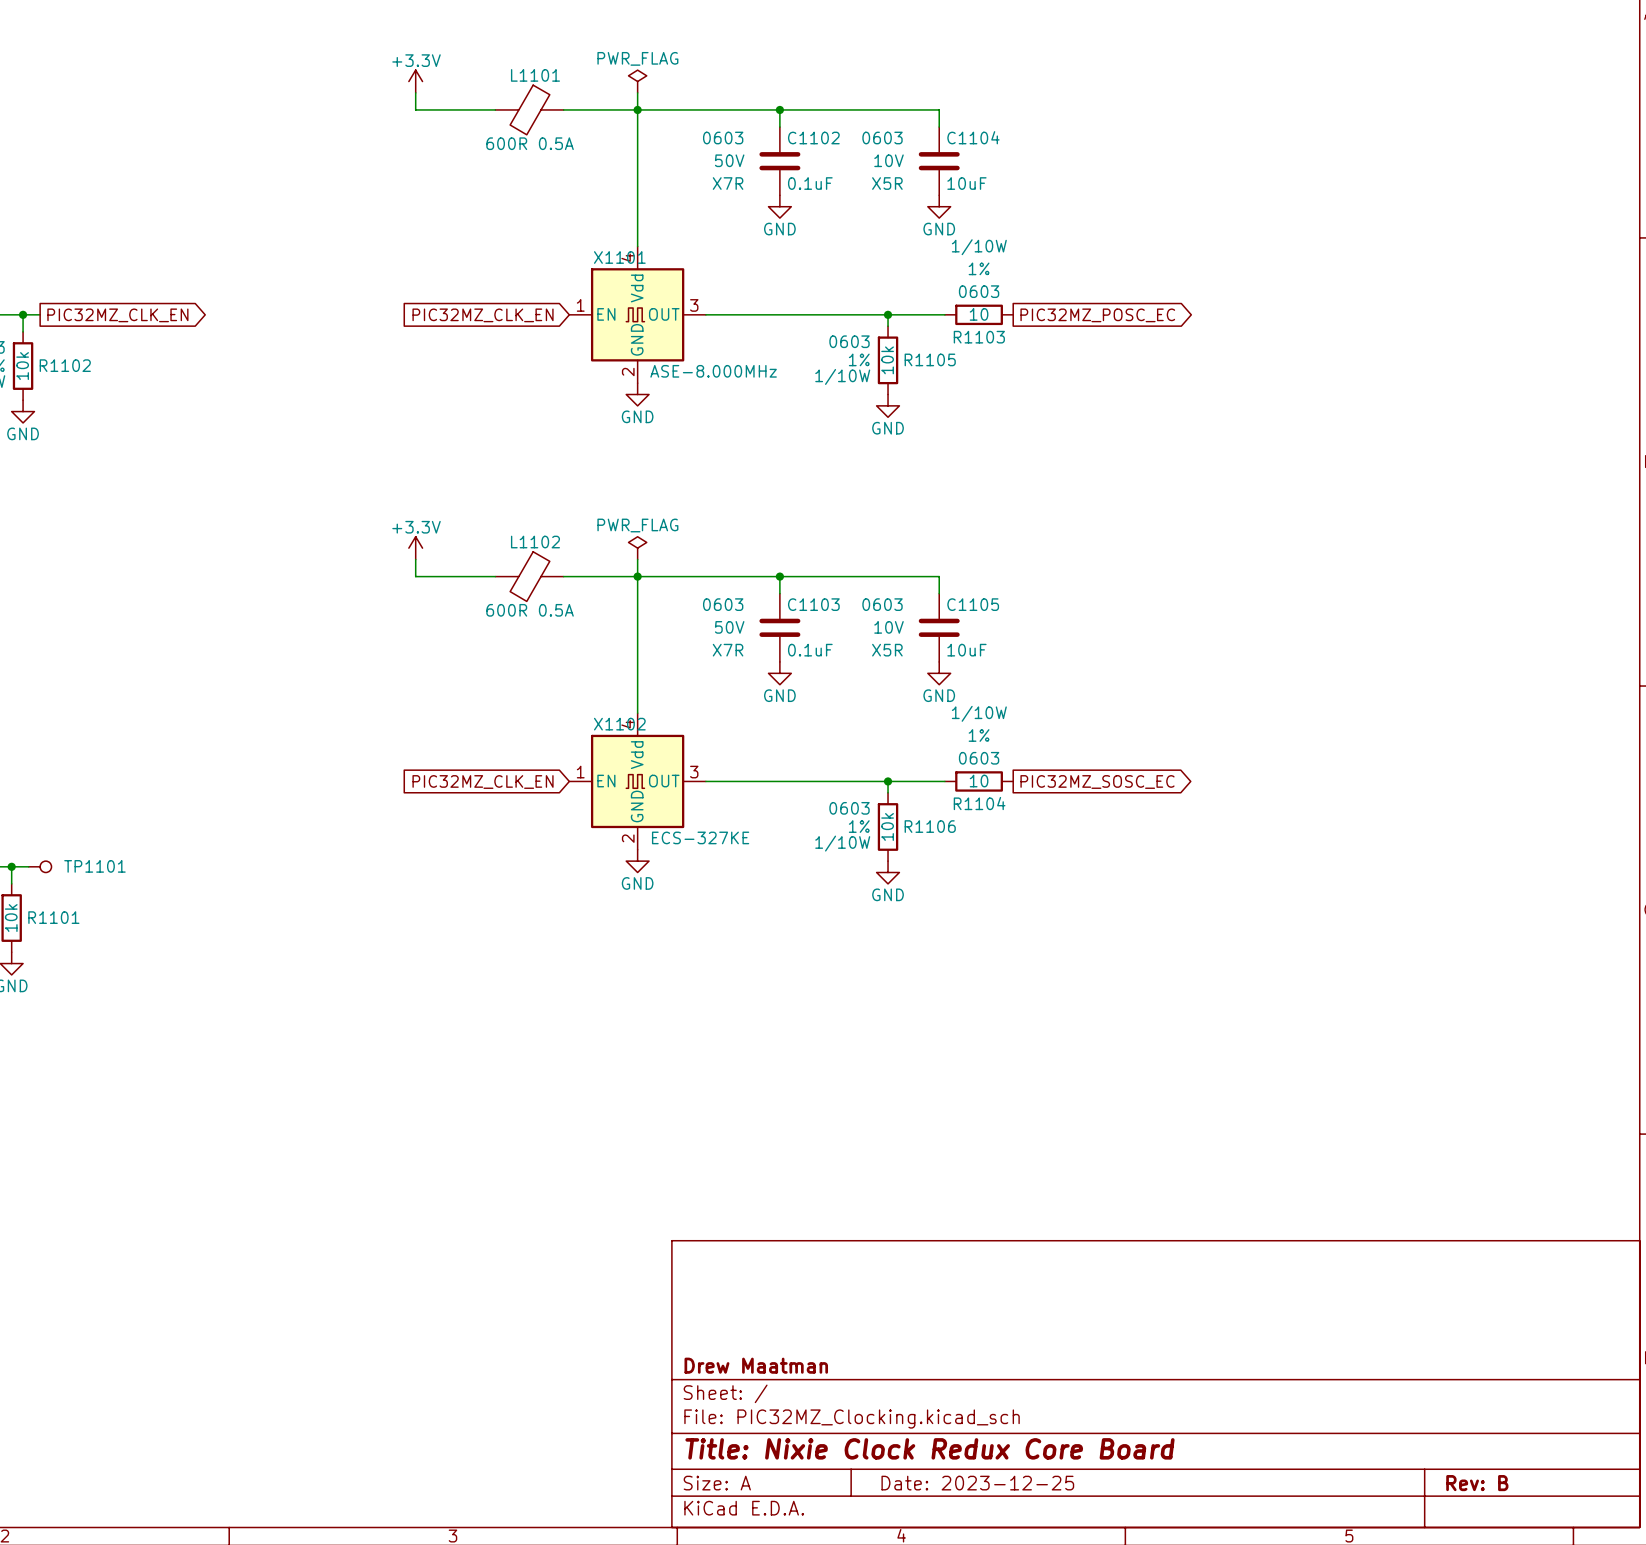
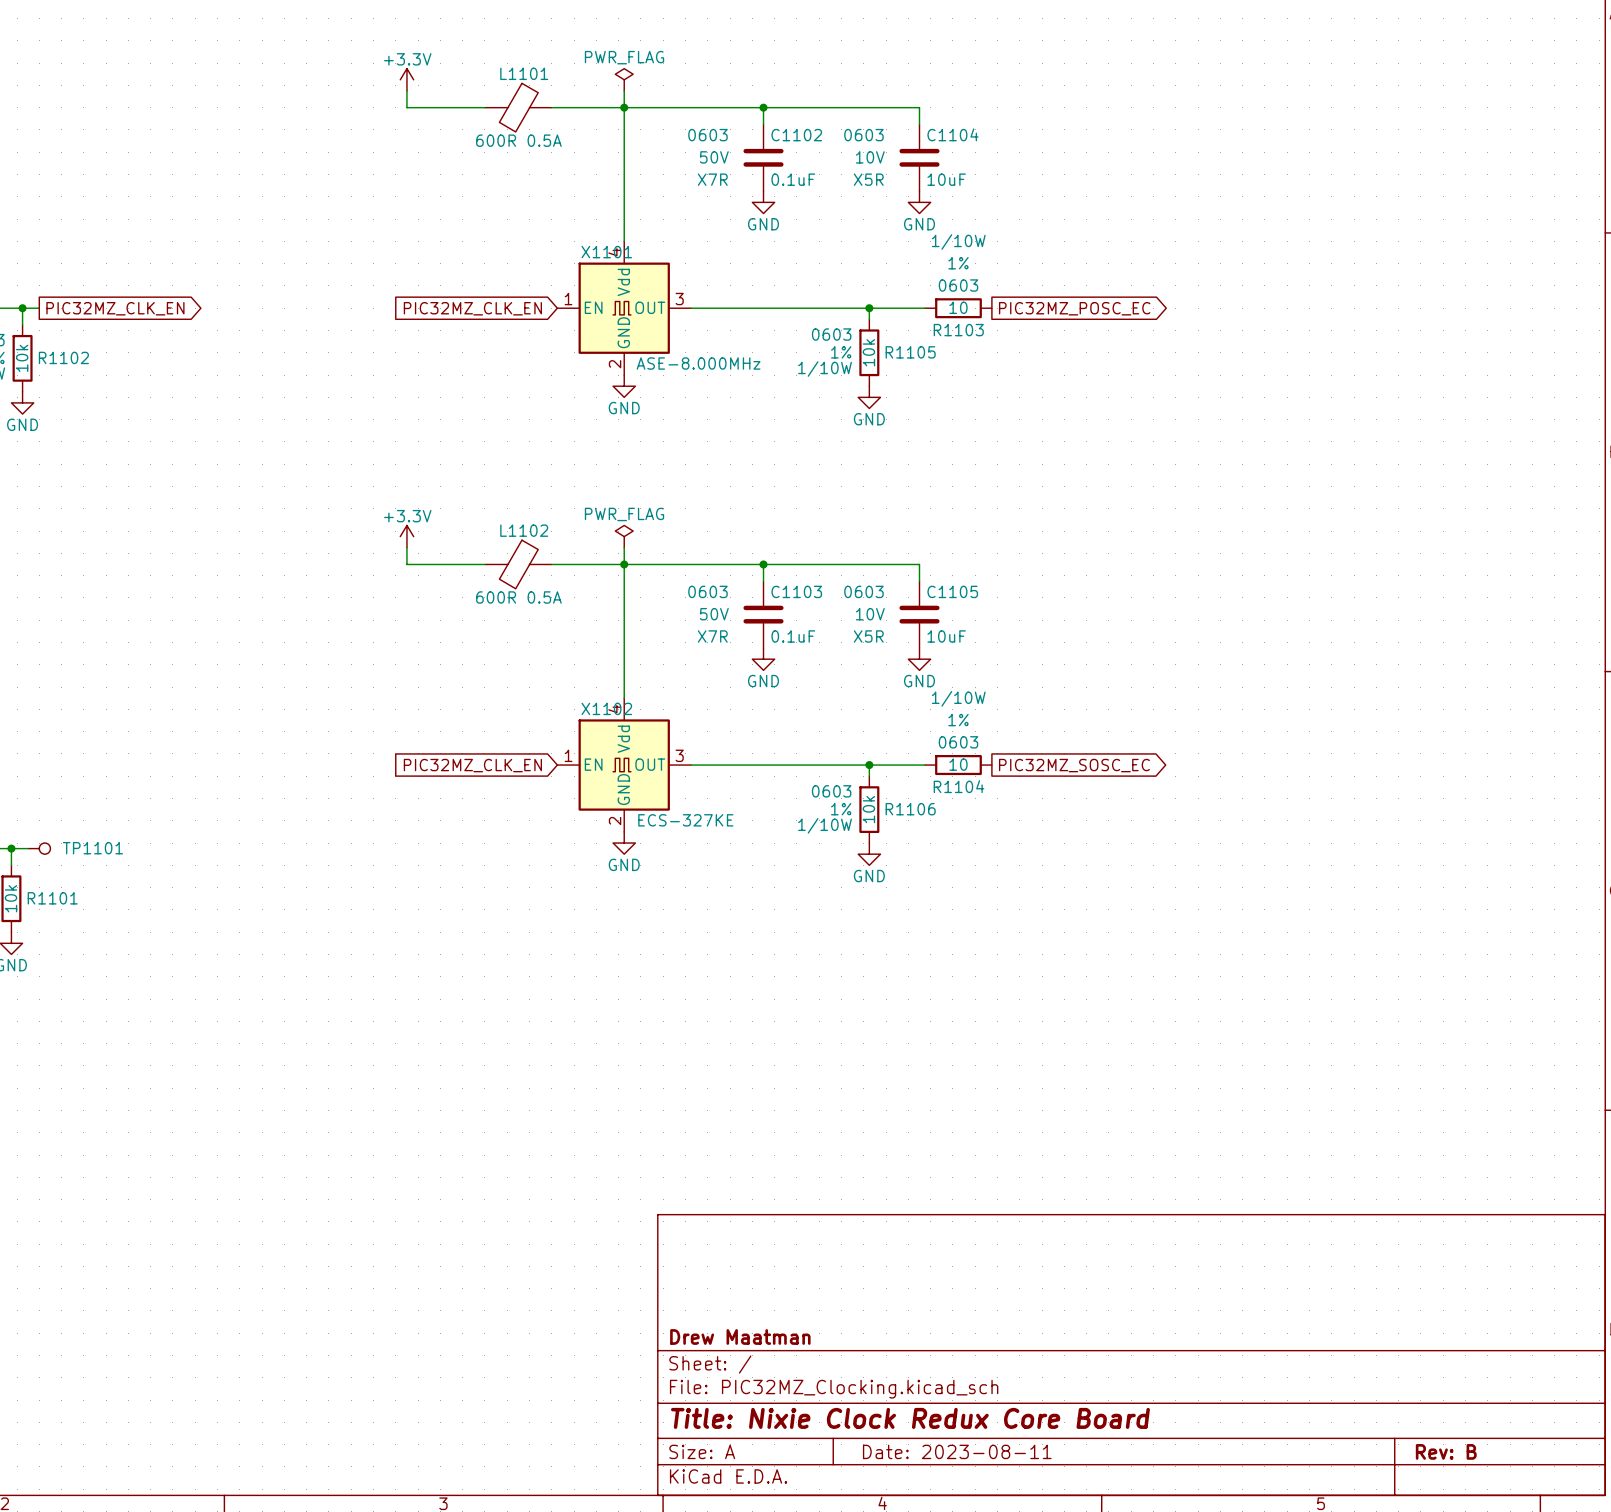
title block: Date: 2023-12-25 (977, 1483) -> Date: 2023-08-11 (957, 1451)

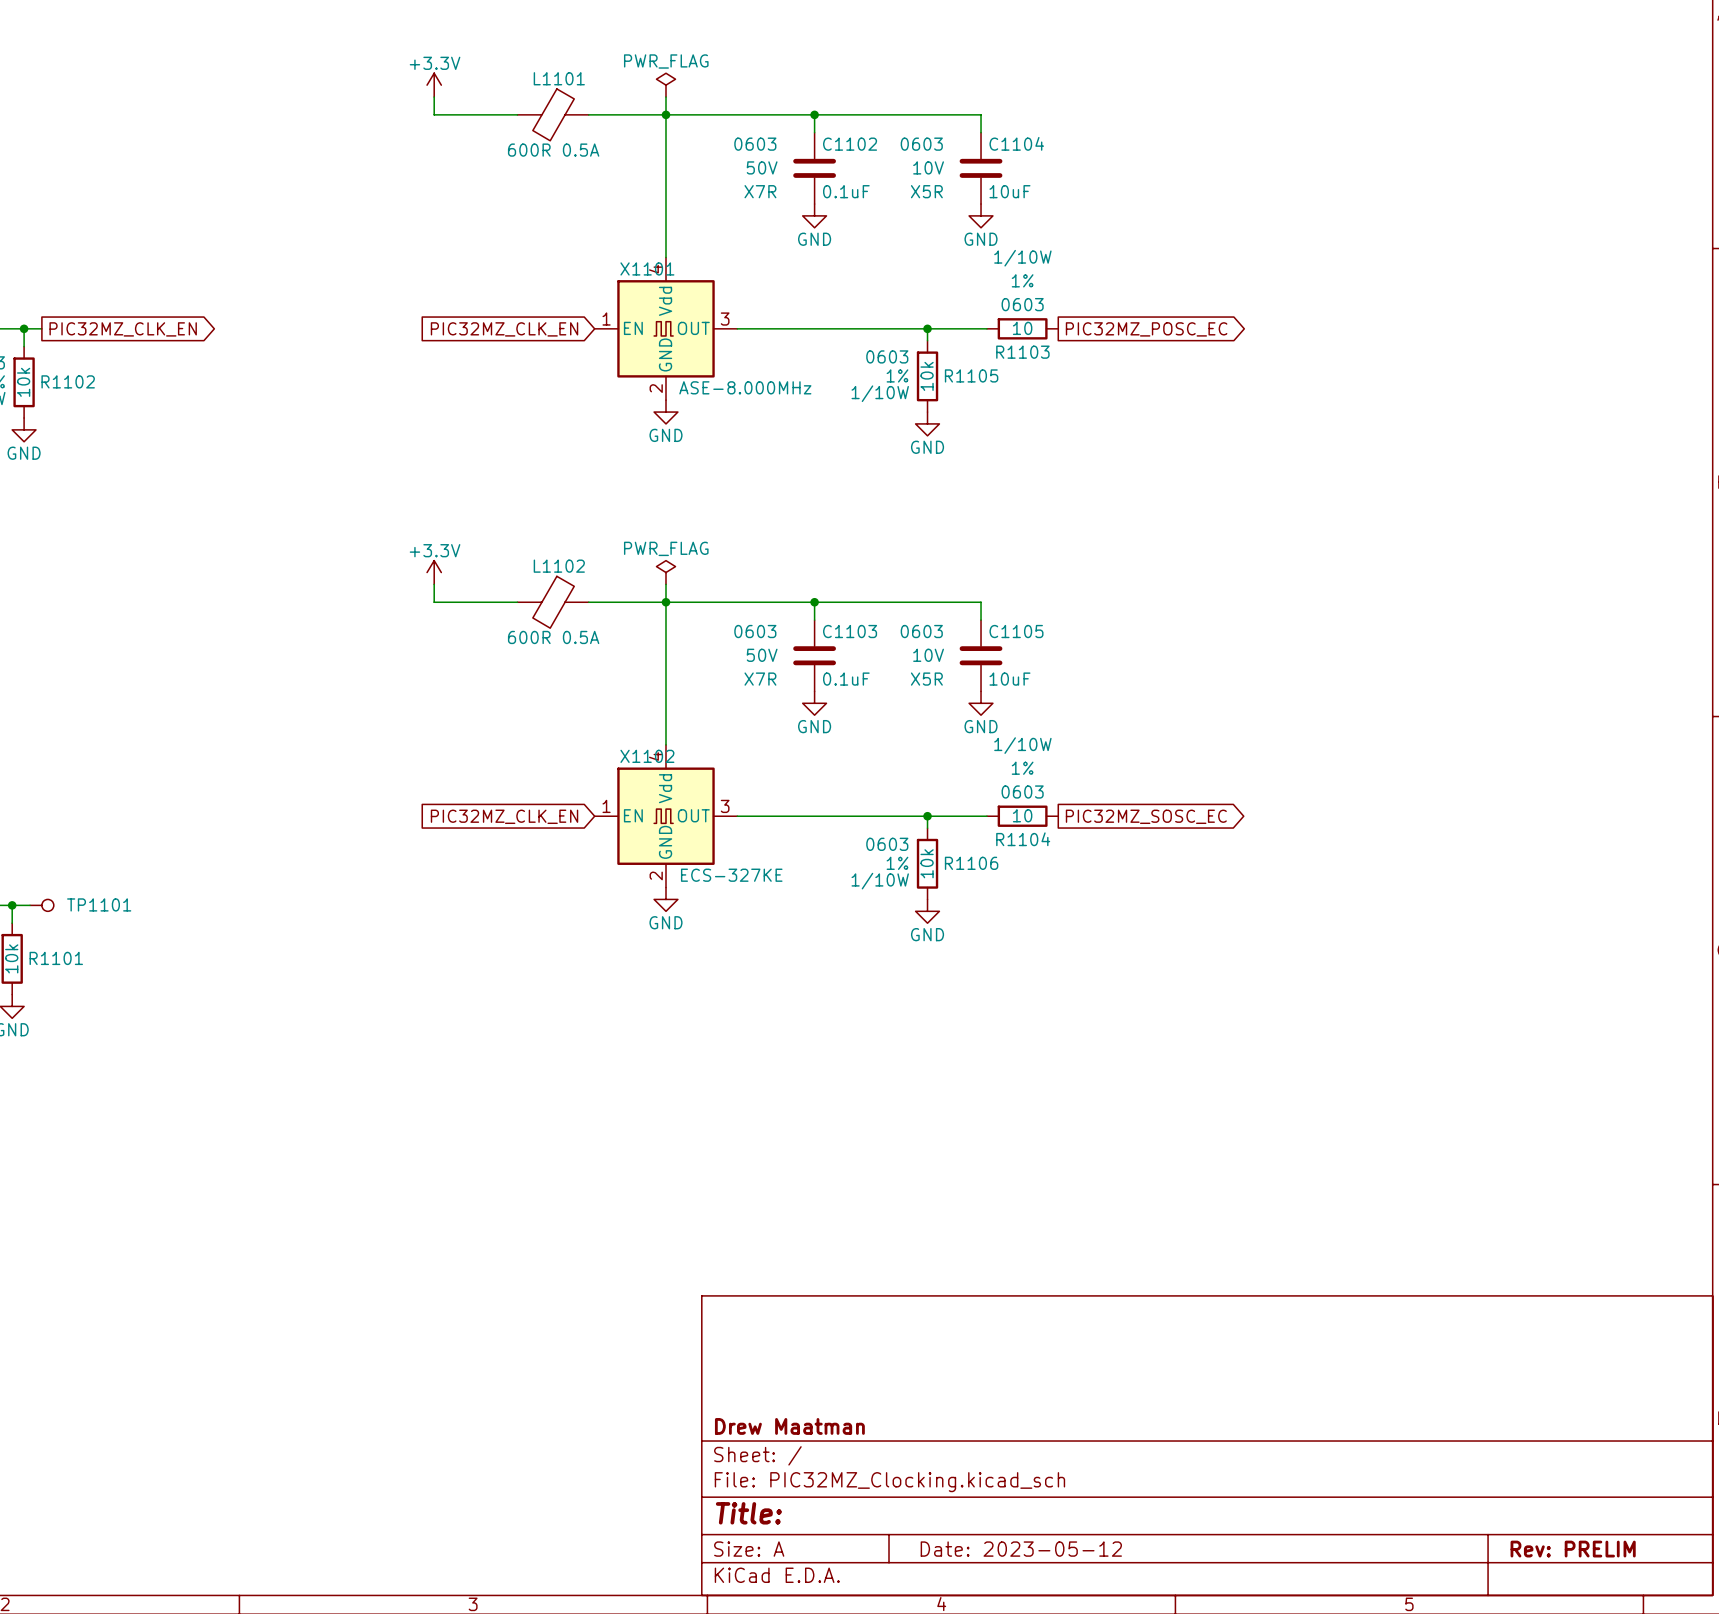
title block: Title: Nixie Clock Redux Core Board (910, 1418) -> Title: (748, 1513)
title block: Date: 2023-08-11 (957, 1451) -> Date: 2023-05-12 (1021, 1549)
title block: Rev: B (1446, 1451) -> Rev: PRELIM (1573, 1549)

